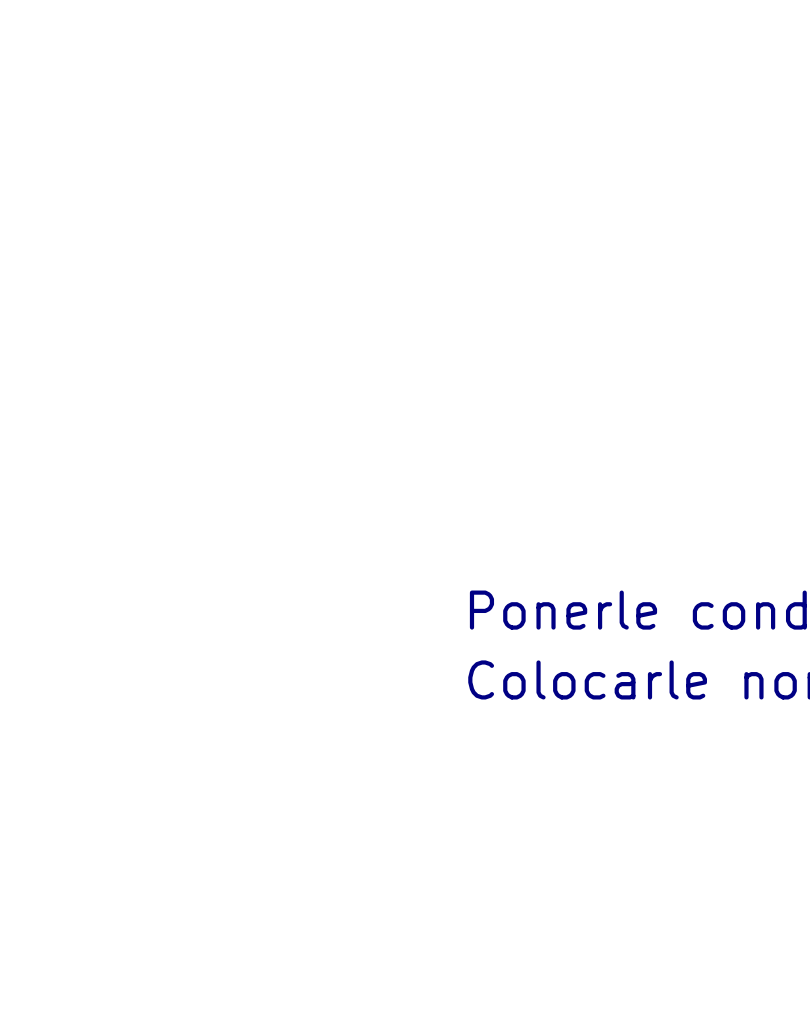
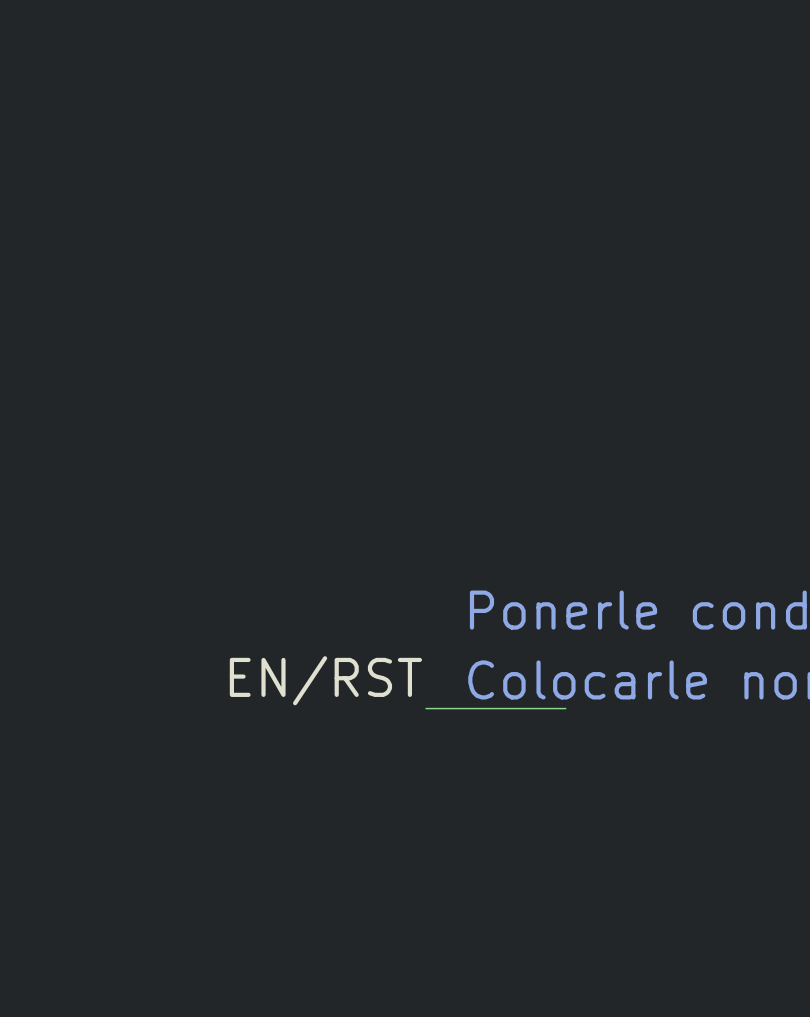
label: none -> EN/RST (325, 680)
wire: none -> (425, 708) (565, 708)

